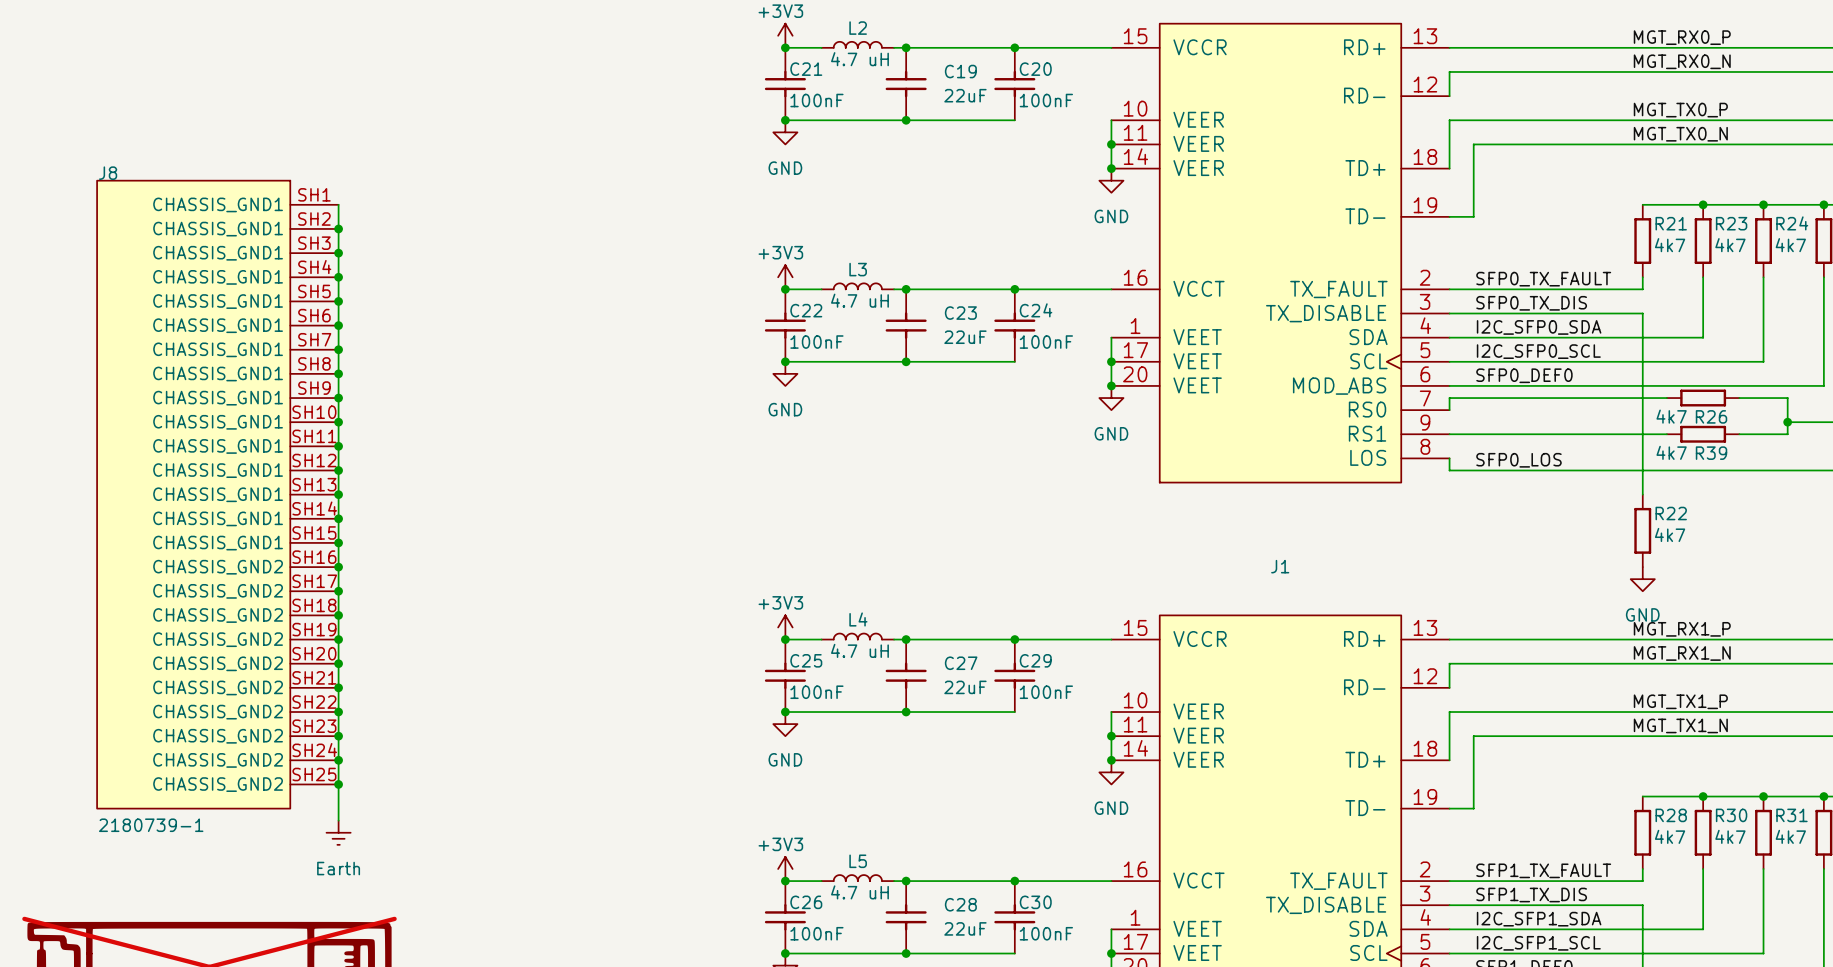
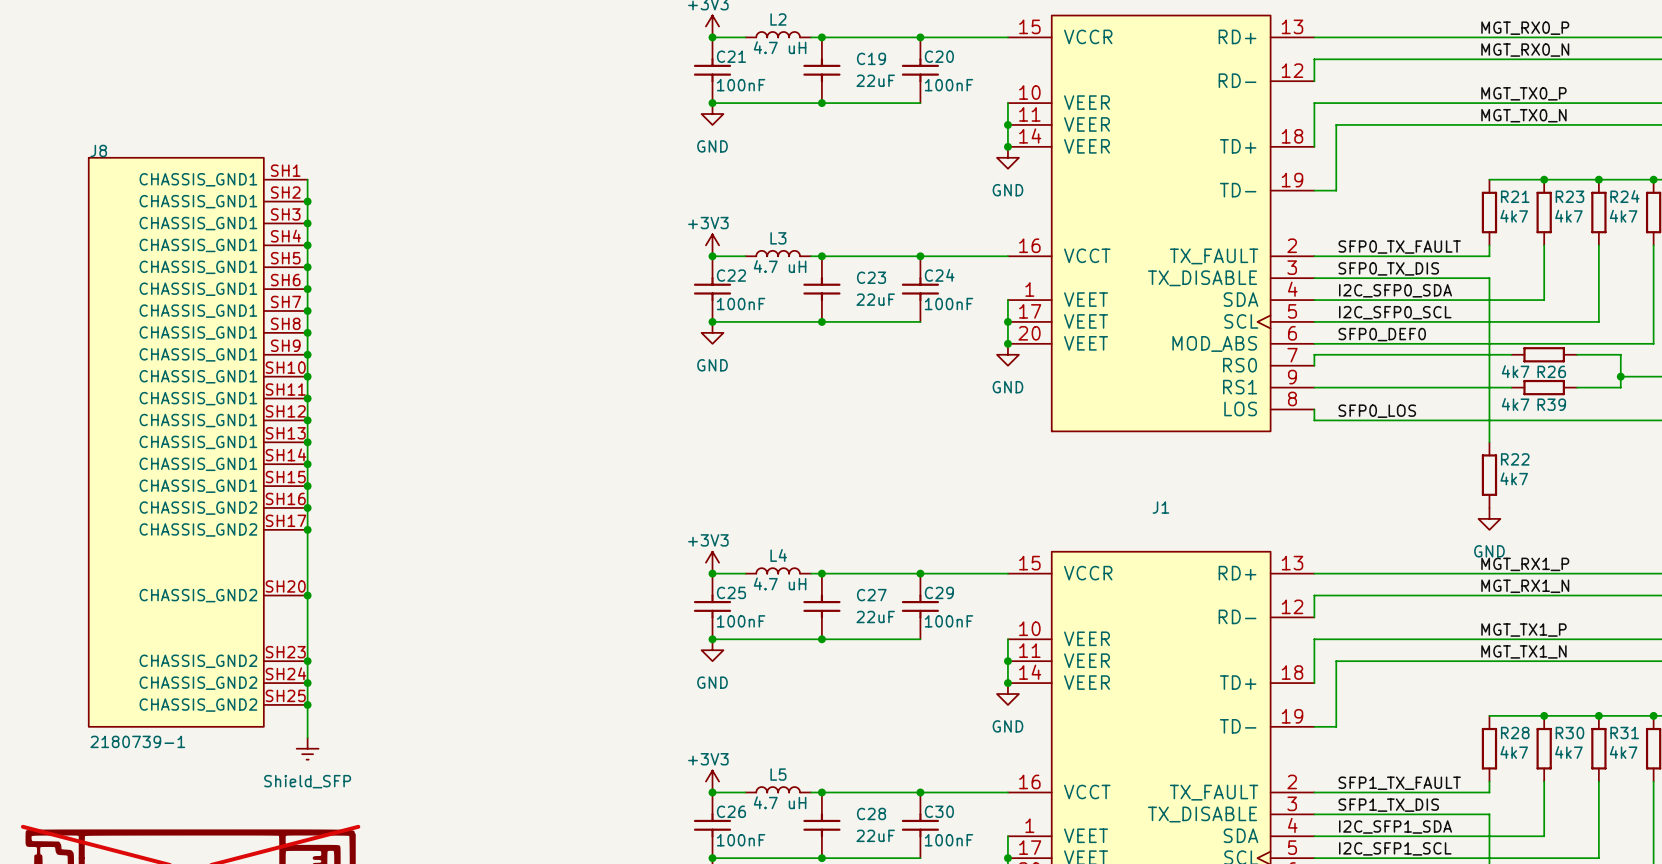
J8 symbol: [96, 180, 339, 809] -> [88, 157, 308, 727]
junction: (338, 615) -> none
junction: (338, 639) -> none
junction: (338, 687) -> none
junction: (338, 712) -> none
power symbol: Earth (338, 832) -> Shield_SFP (307, 748)

